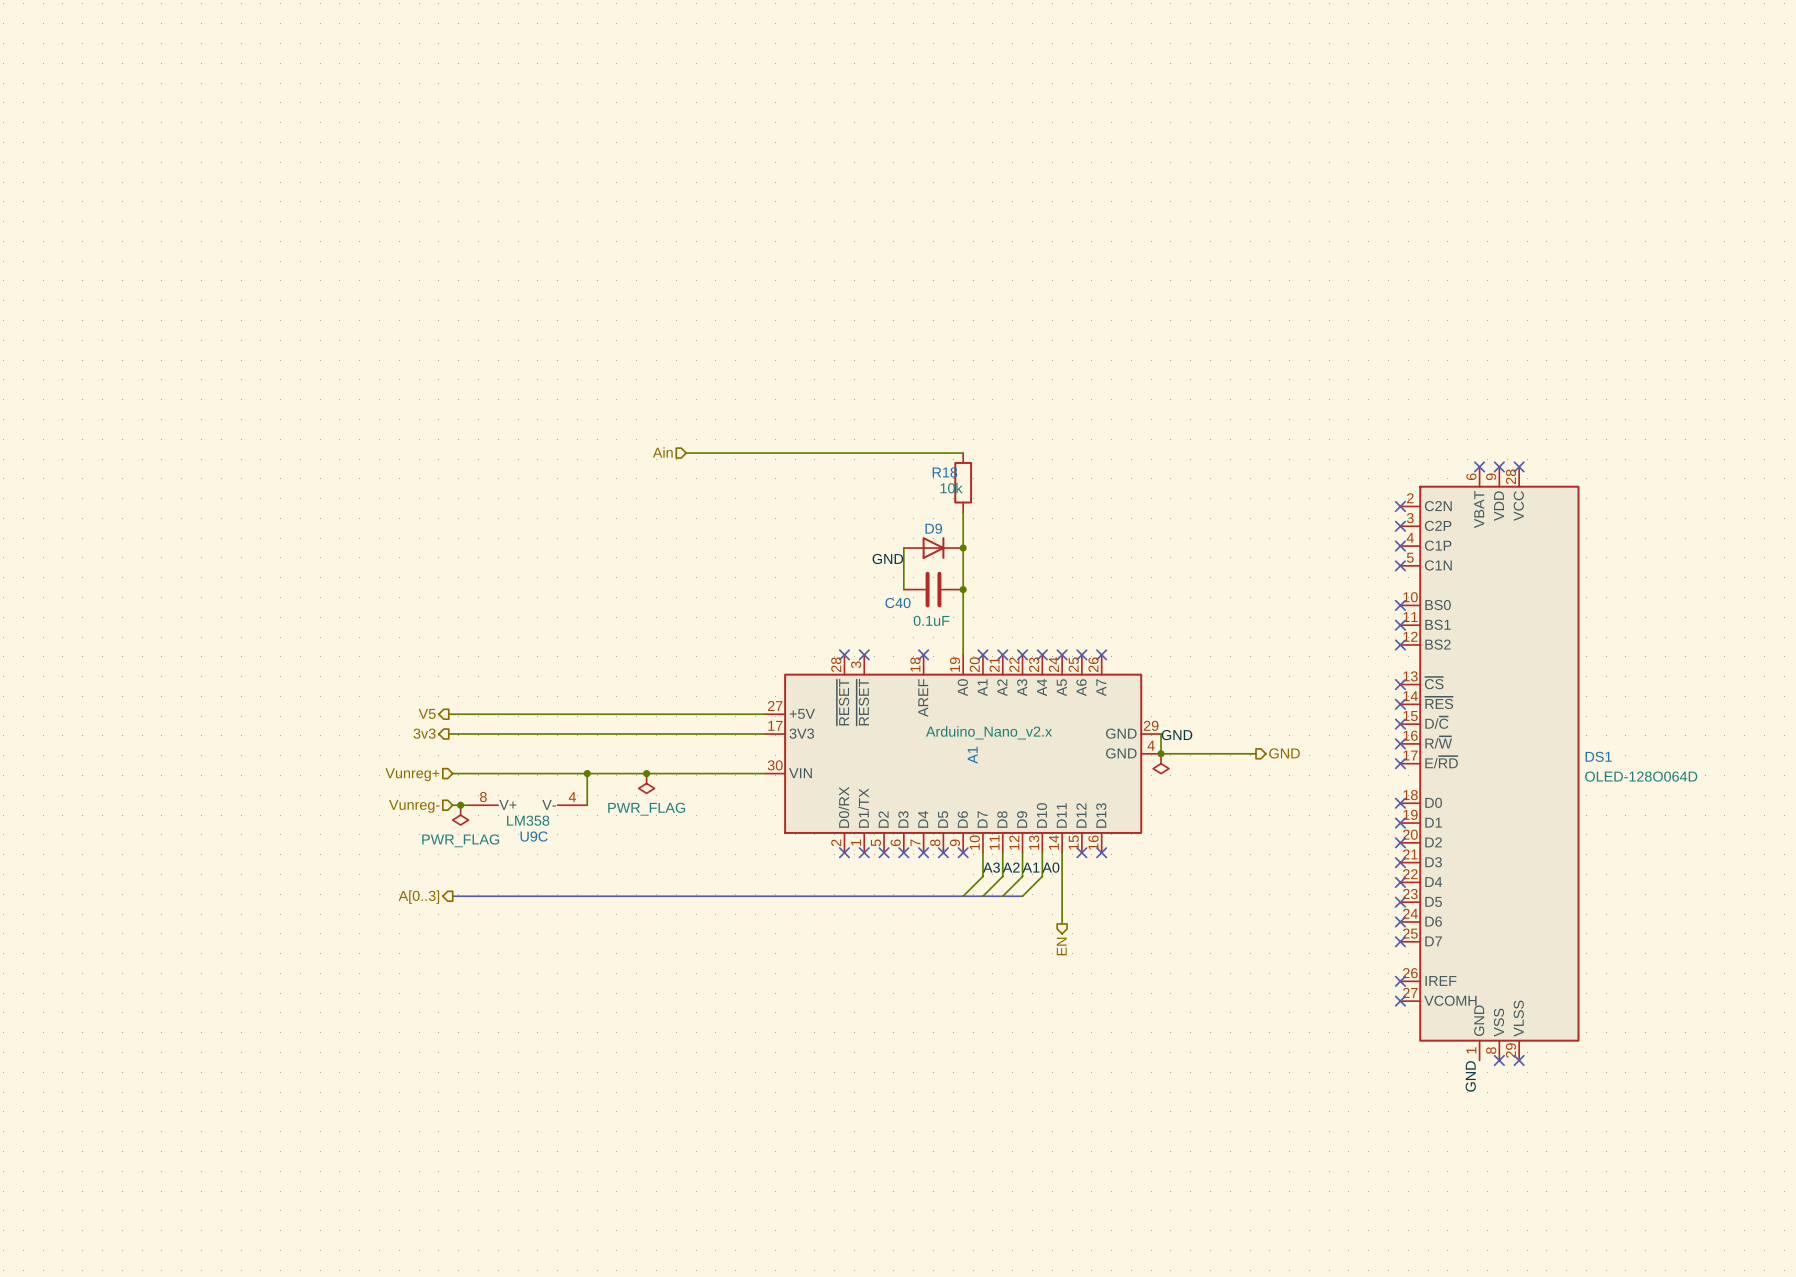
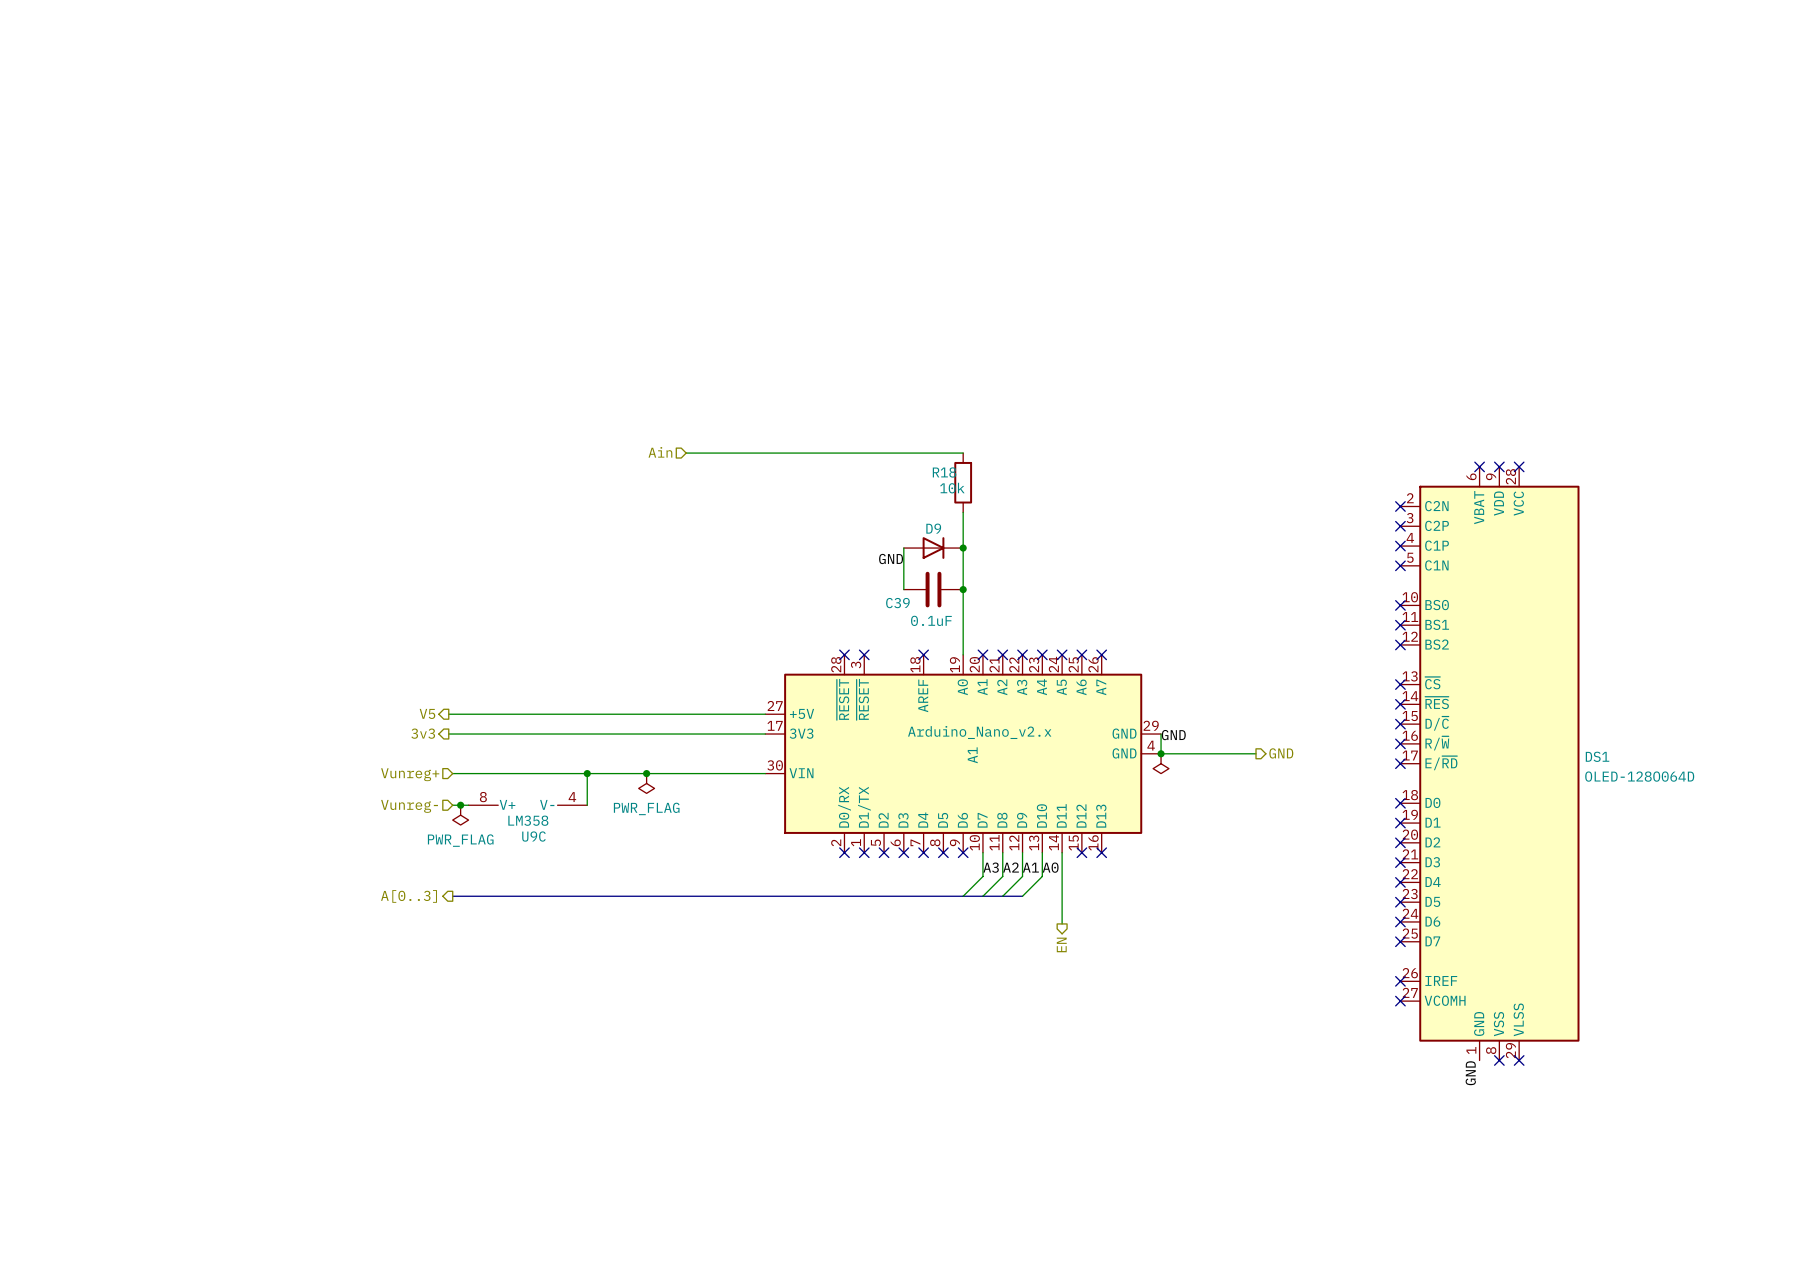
C40 name: C40 (897, 603) -> C39 (897, 603)

